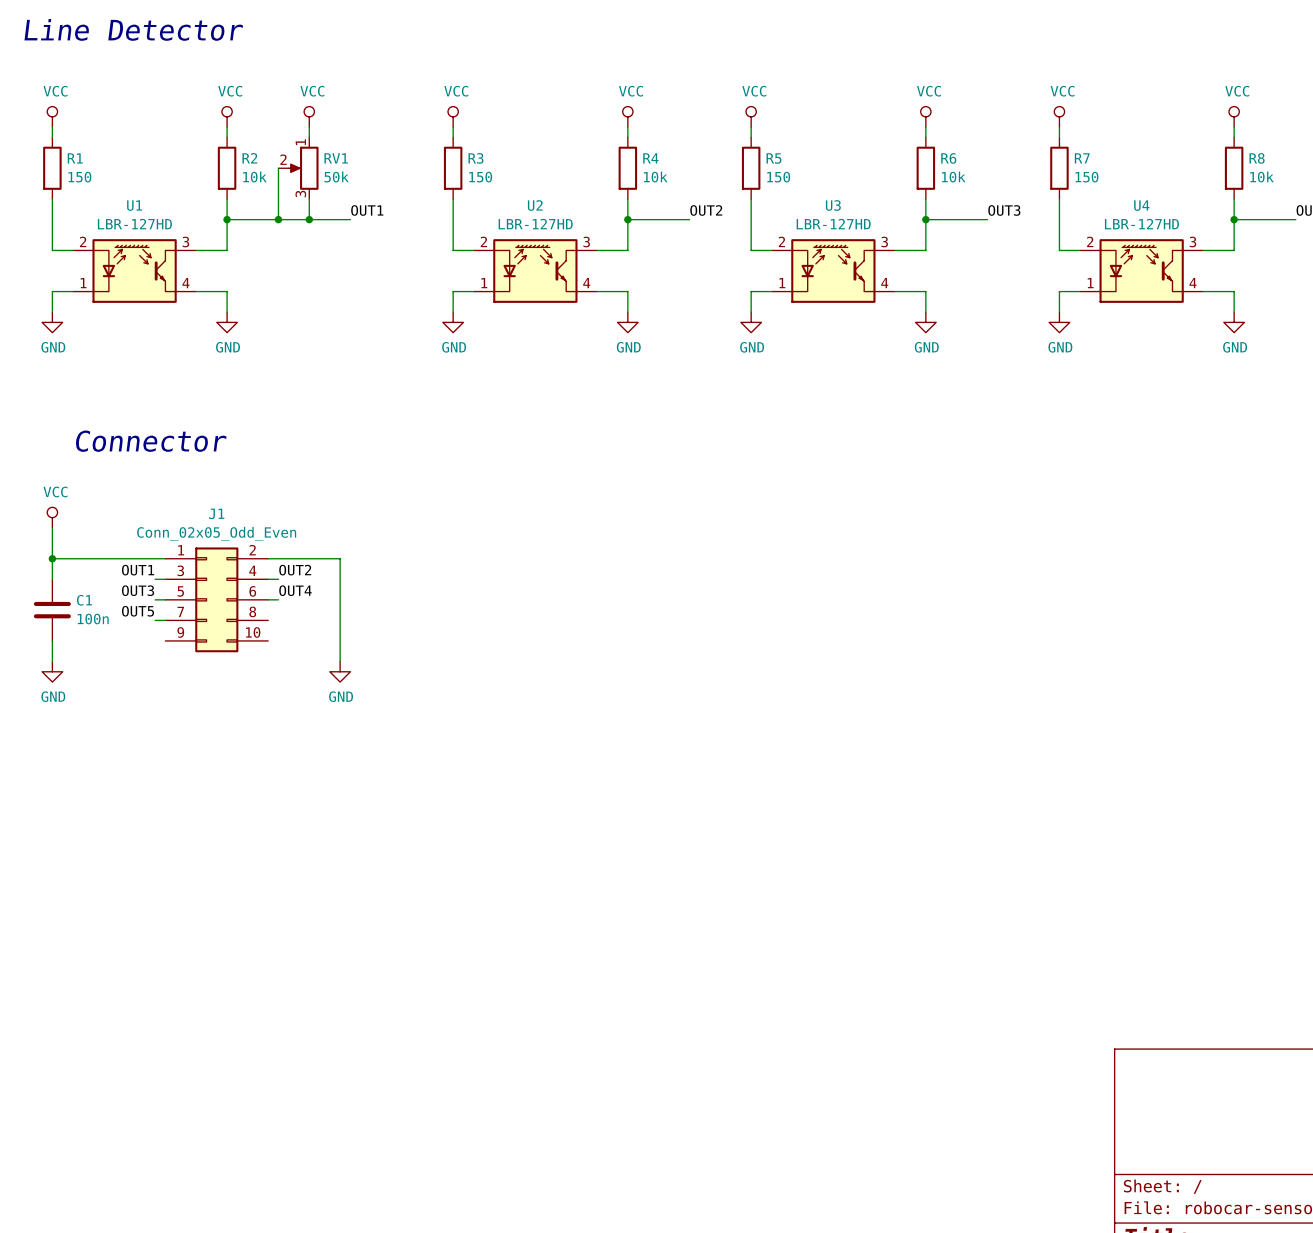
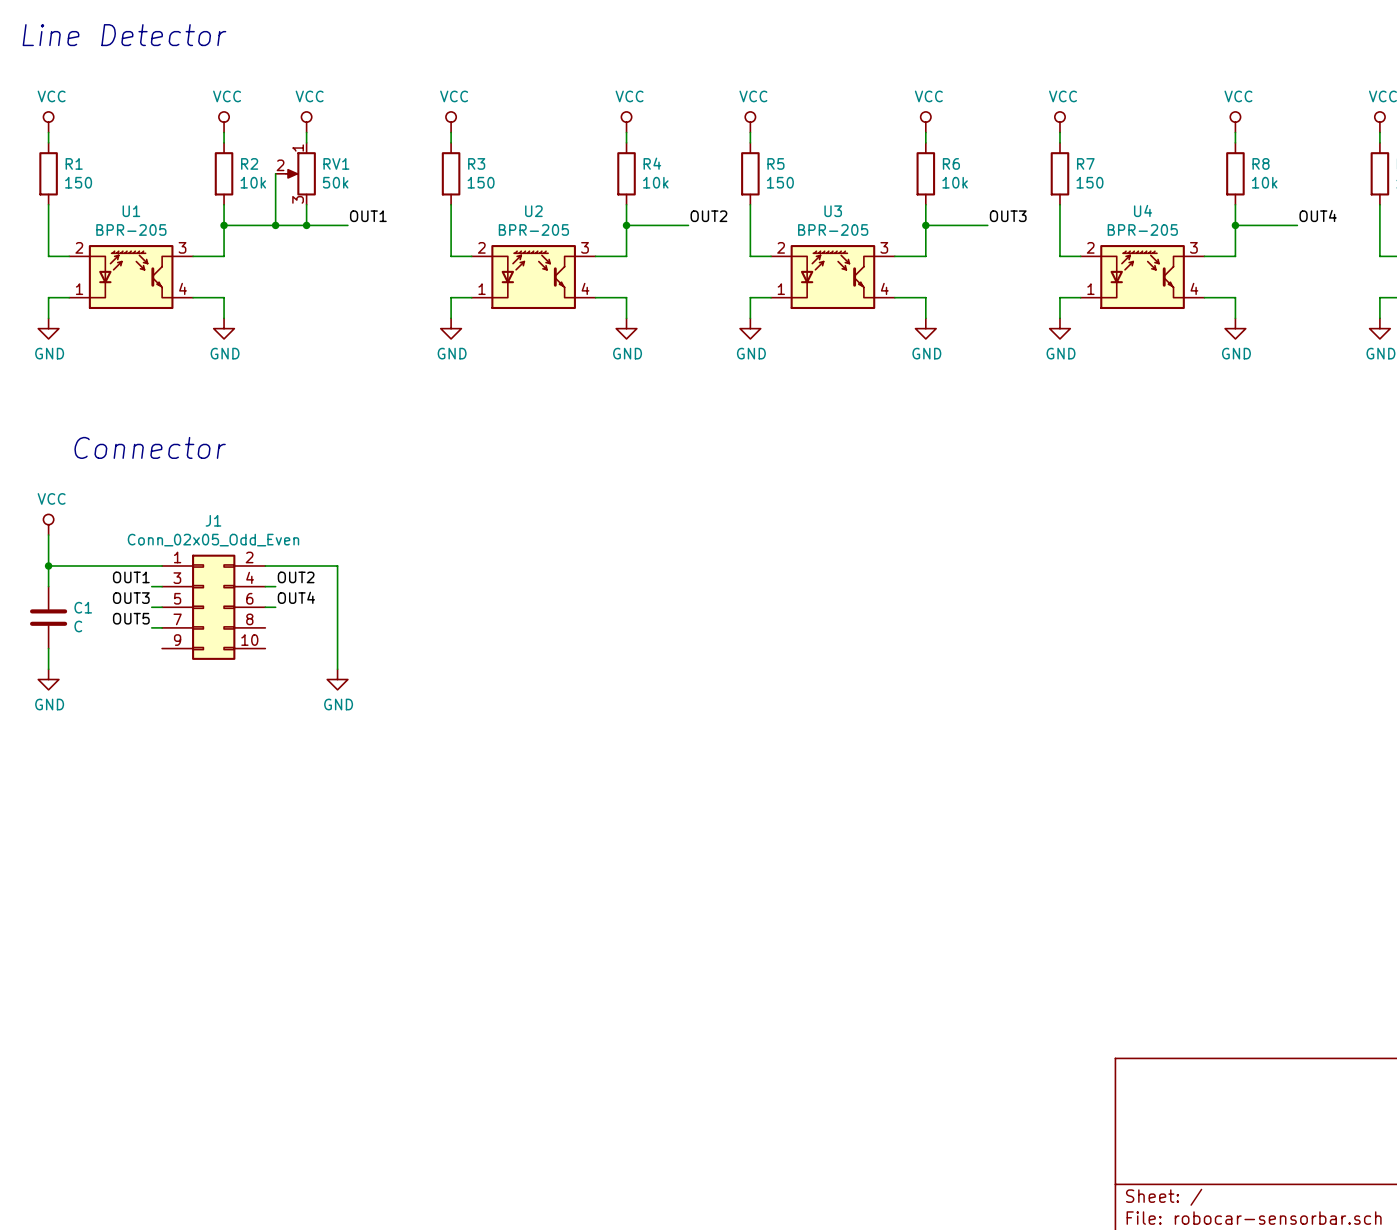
U1 value: LBR-127HD (134, 224) -> BPR-205 (131, 229)
U2 value: LBR-127HD (535, 224) -> BPR-205 (533, 229)
U3 value: LBR-127HD (833, 224) -> BPR-205 (833, 229)
U4 value: LBR-127HD (1141, 224) -> BPR-205 (1142, 229)
C1 value: 100n (93, 619) -> C (78, 626)

